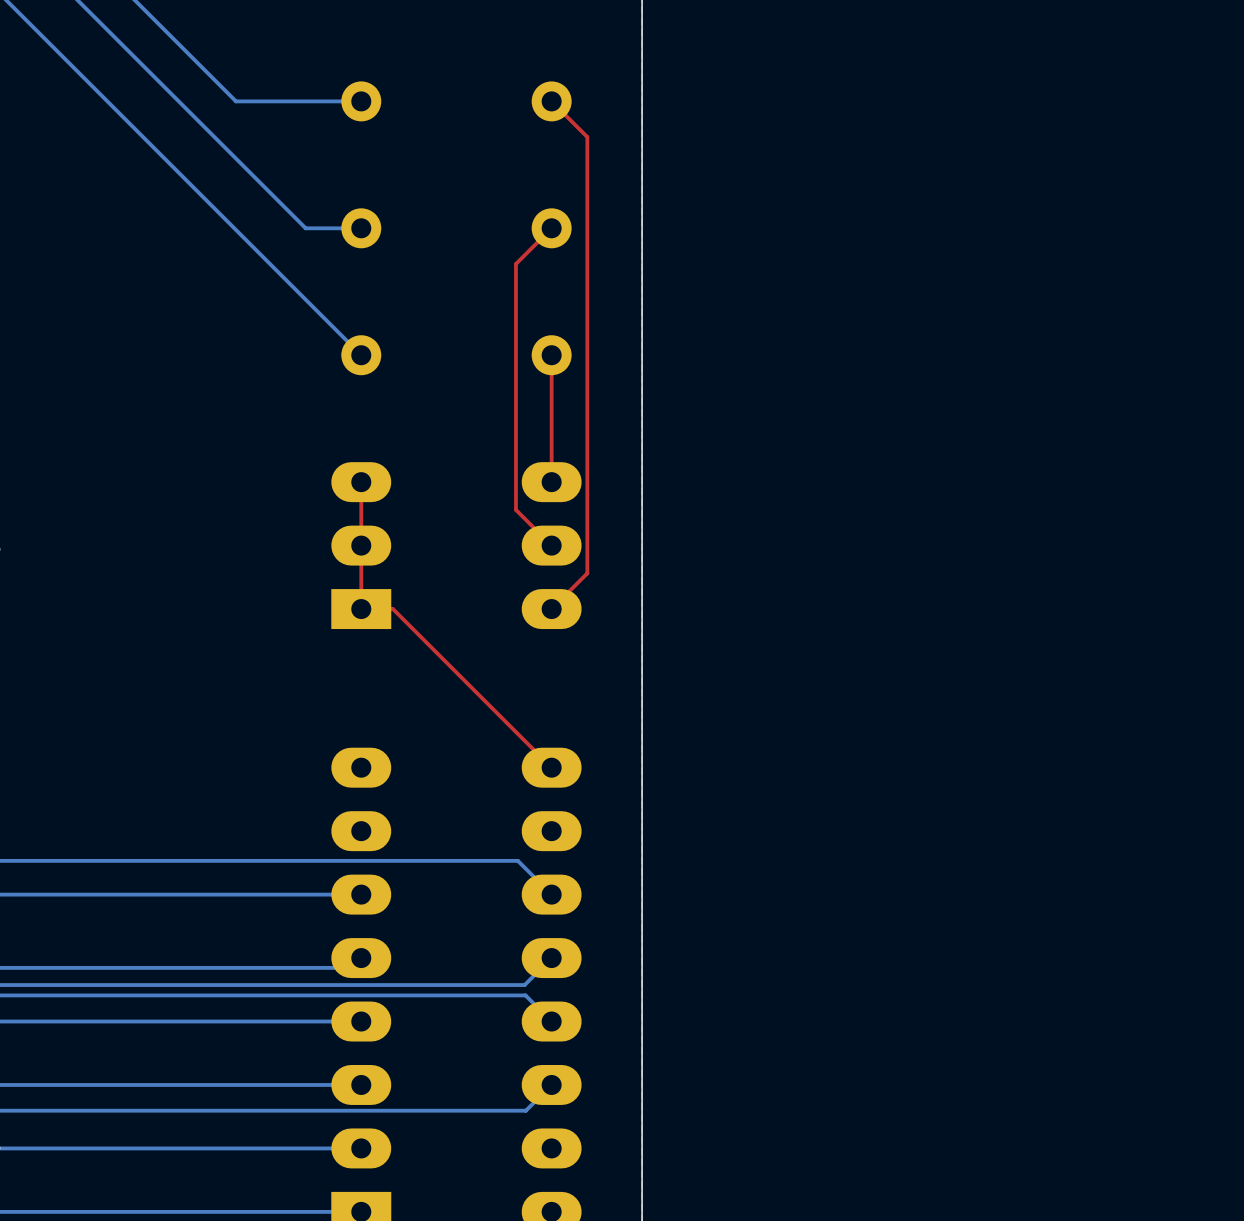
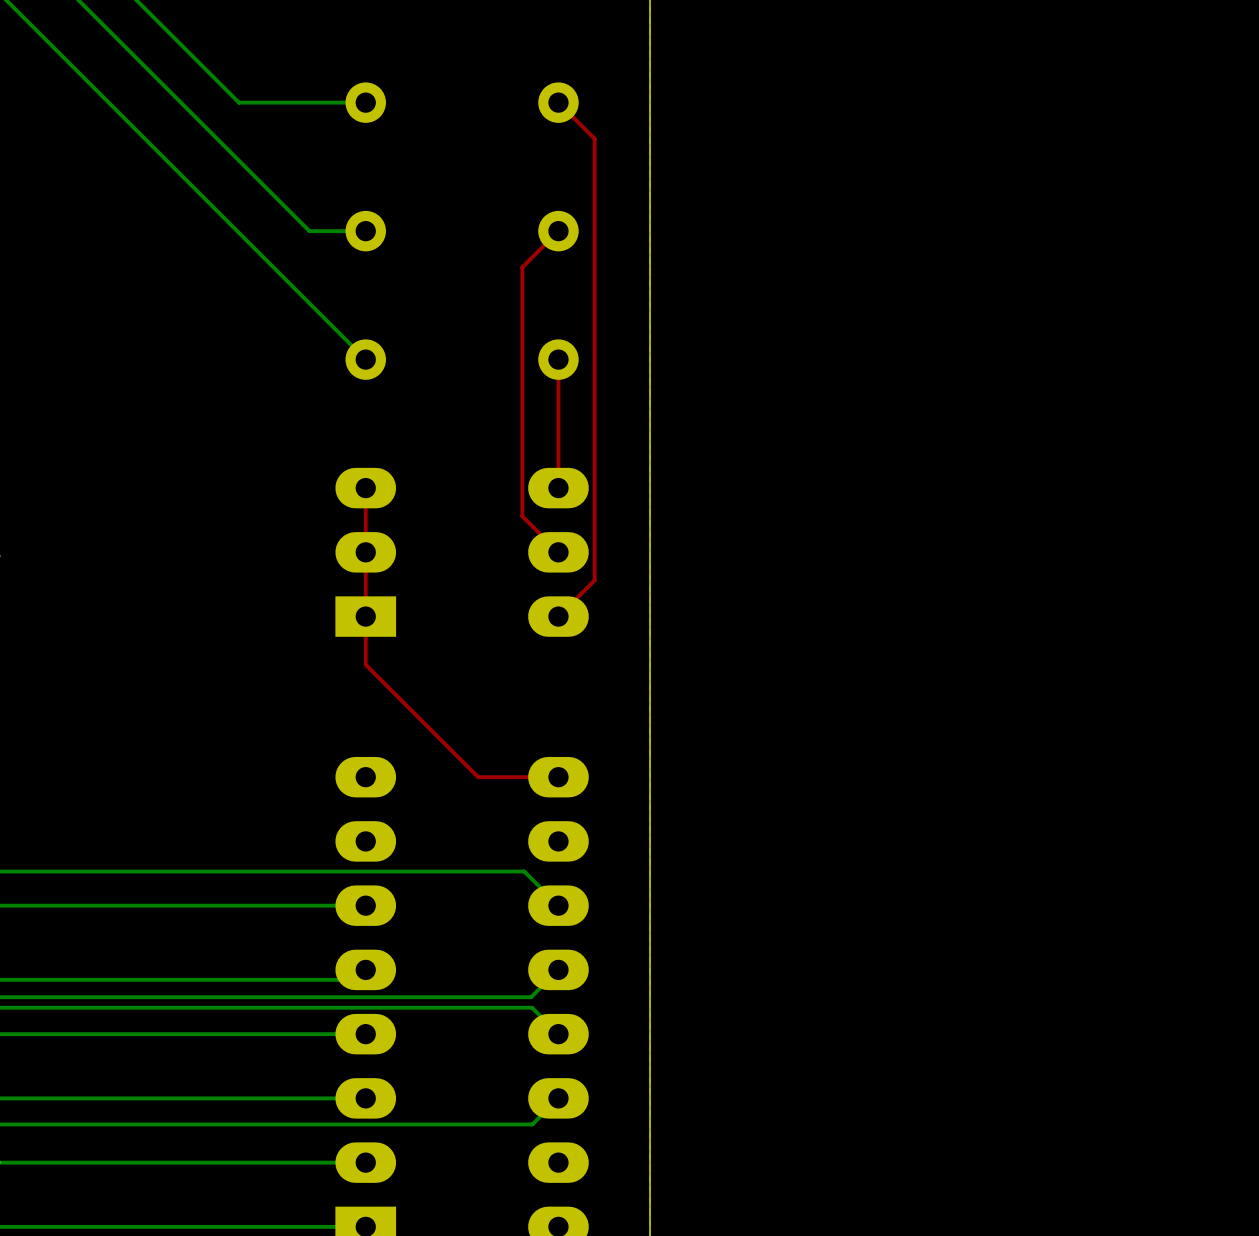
top track: (361, 609) (393, 609) (551, 767) -> (365, 616) (365, 664) (478, 777) (558, 777)

